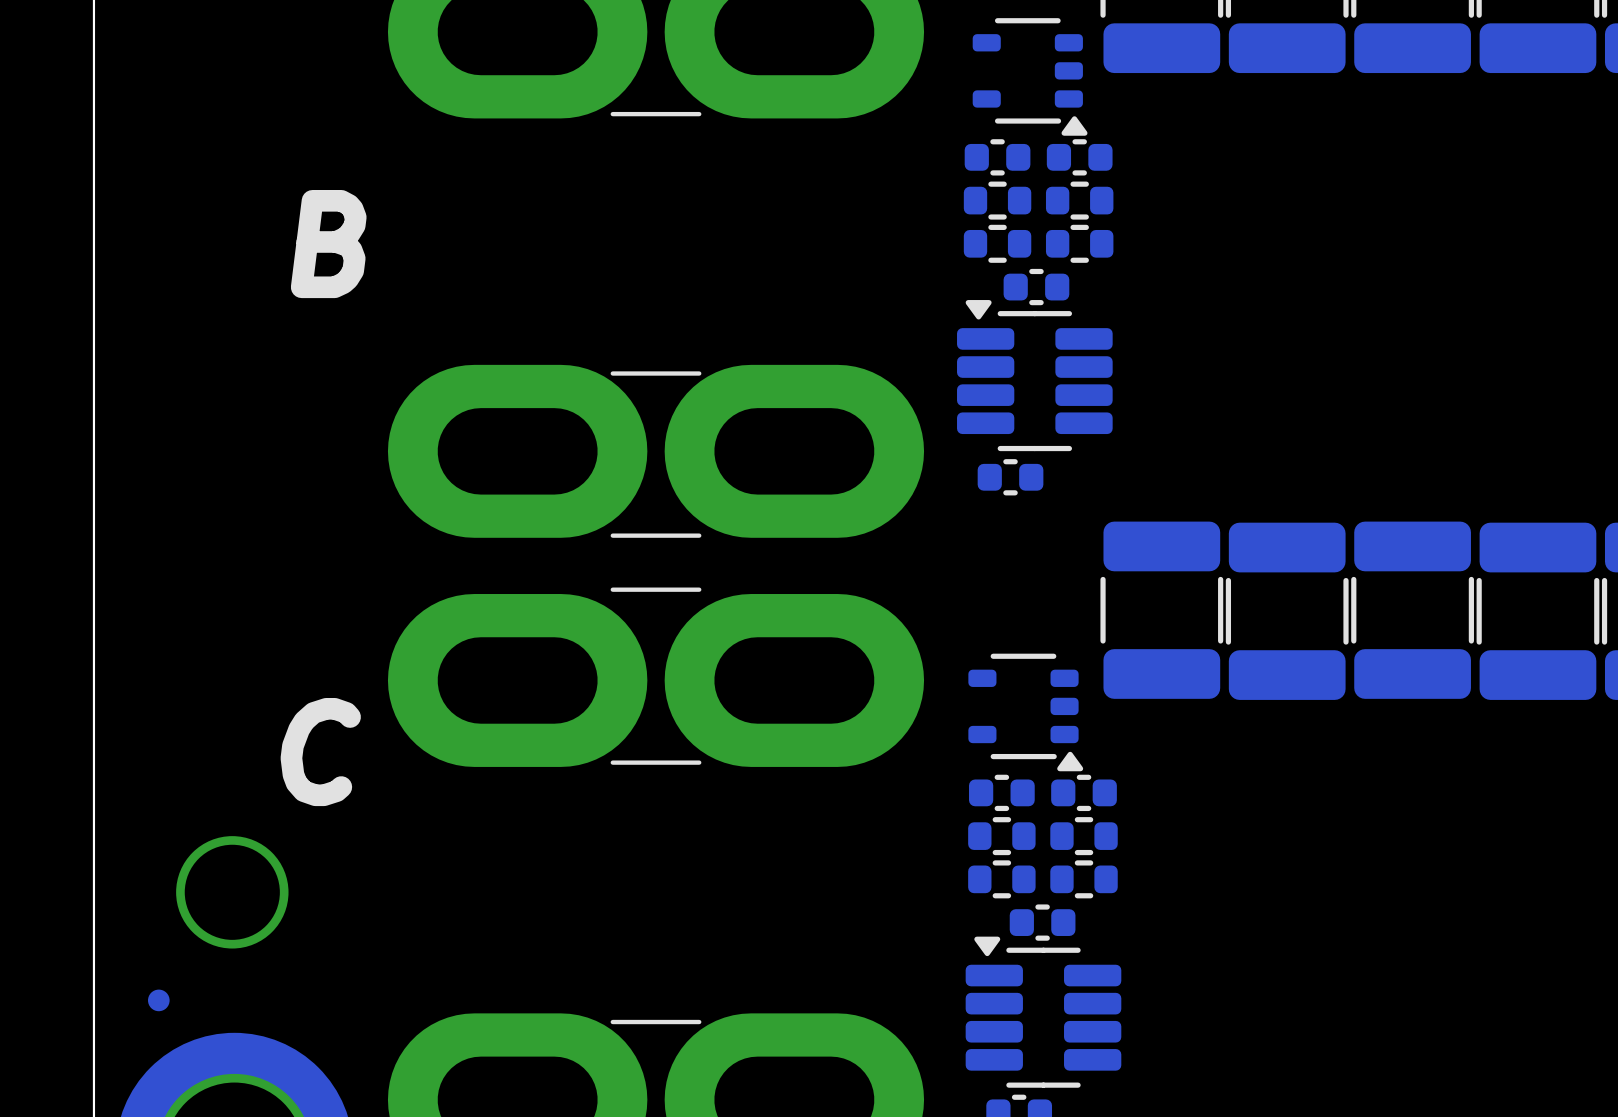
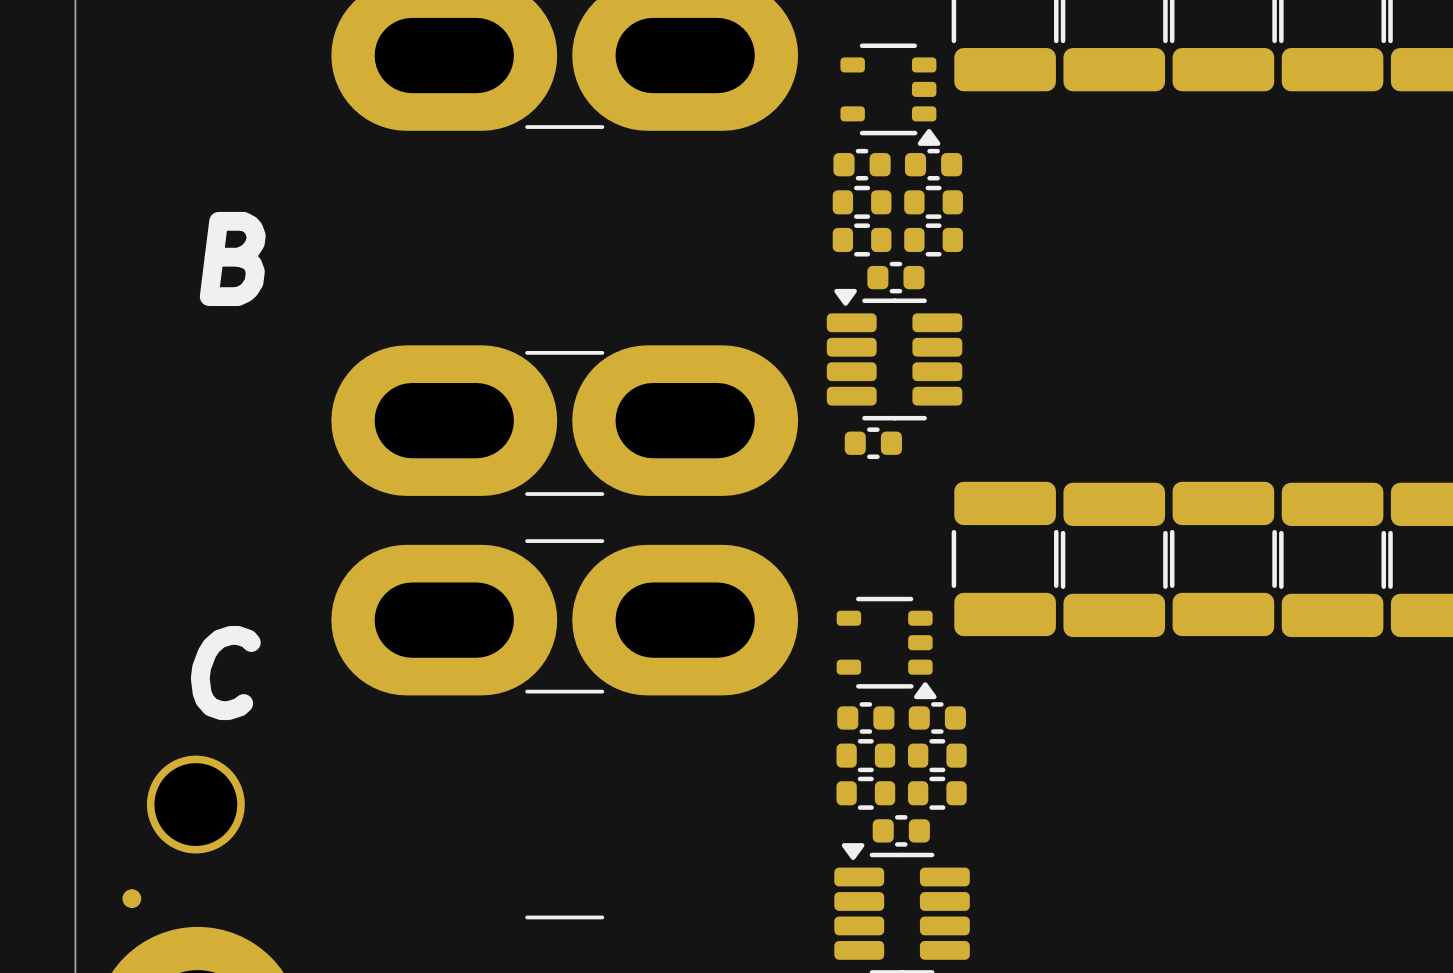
text position: B (328, 244) -> B (232, 258)
text position: C (320, 752) -> C (225, 673)

